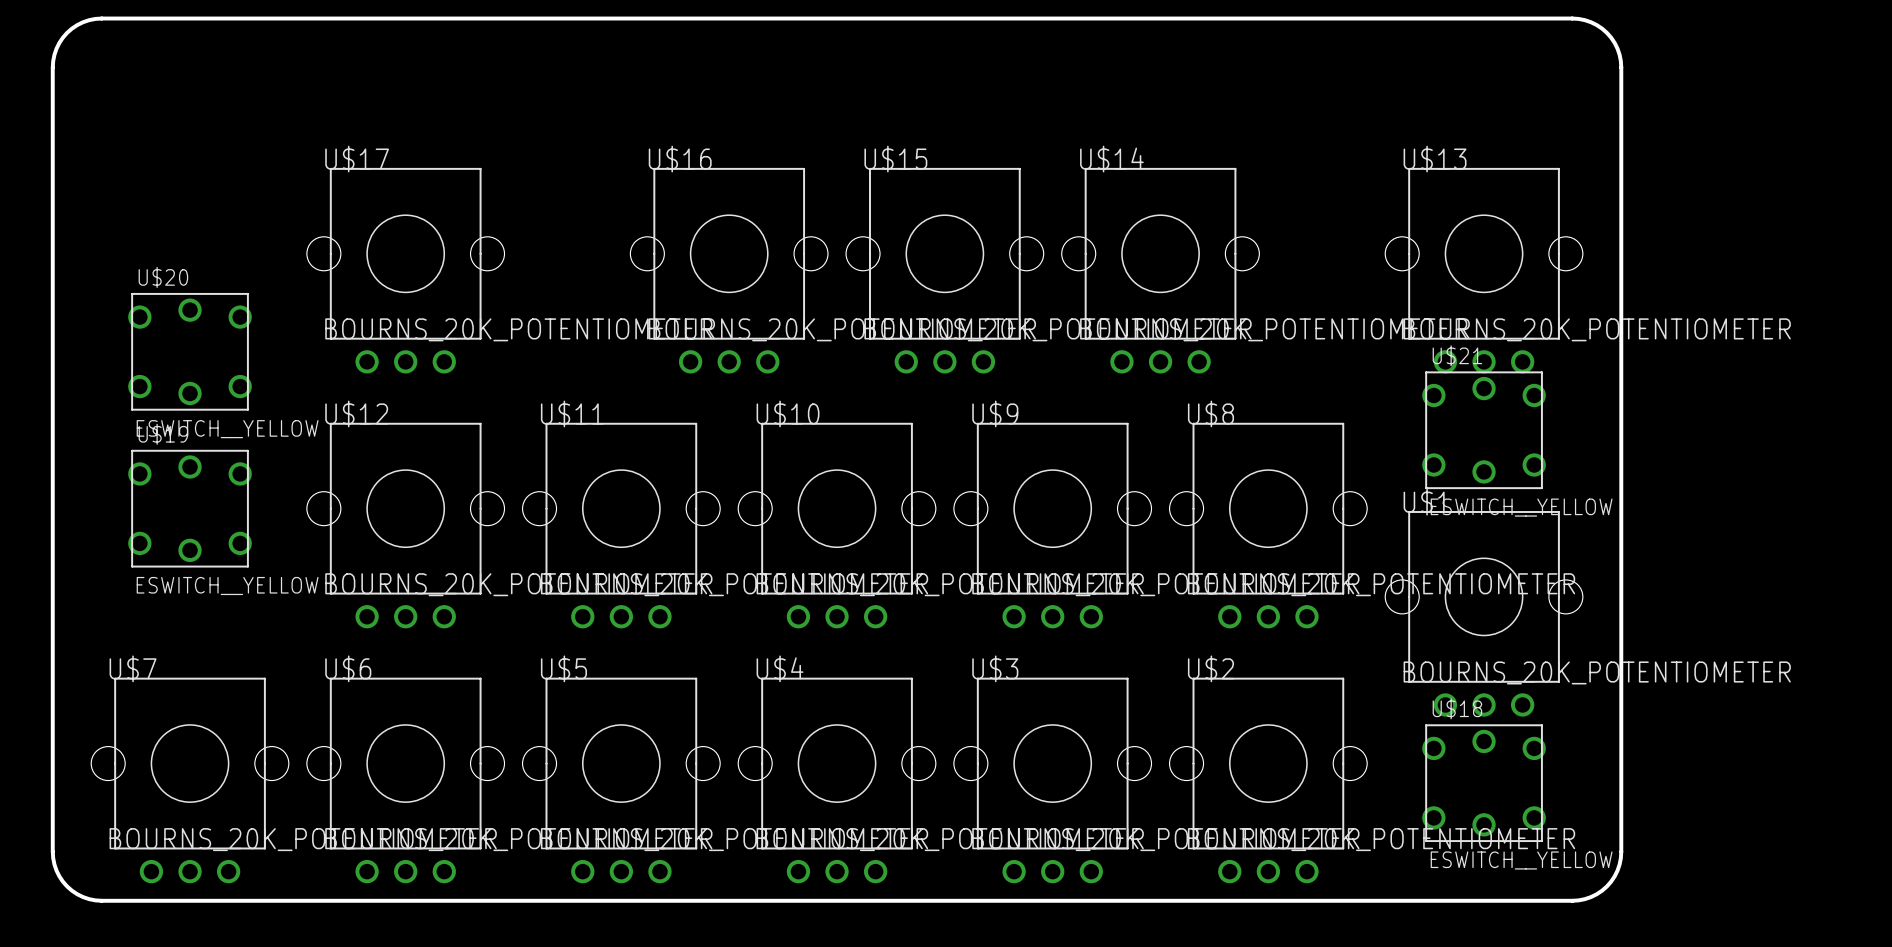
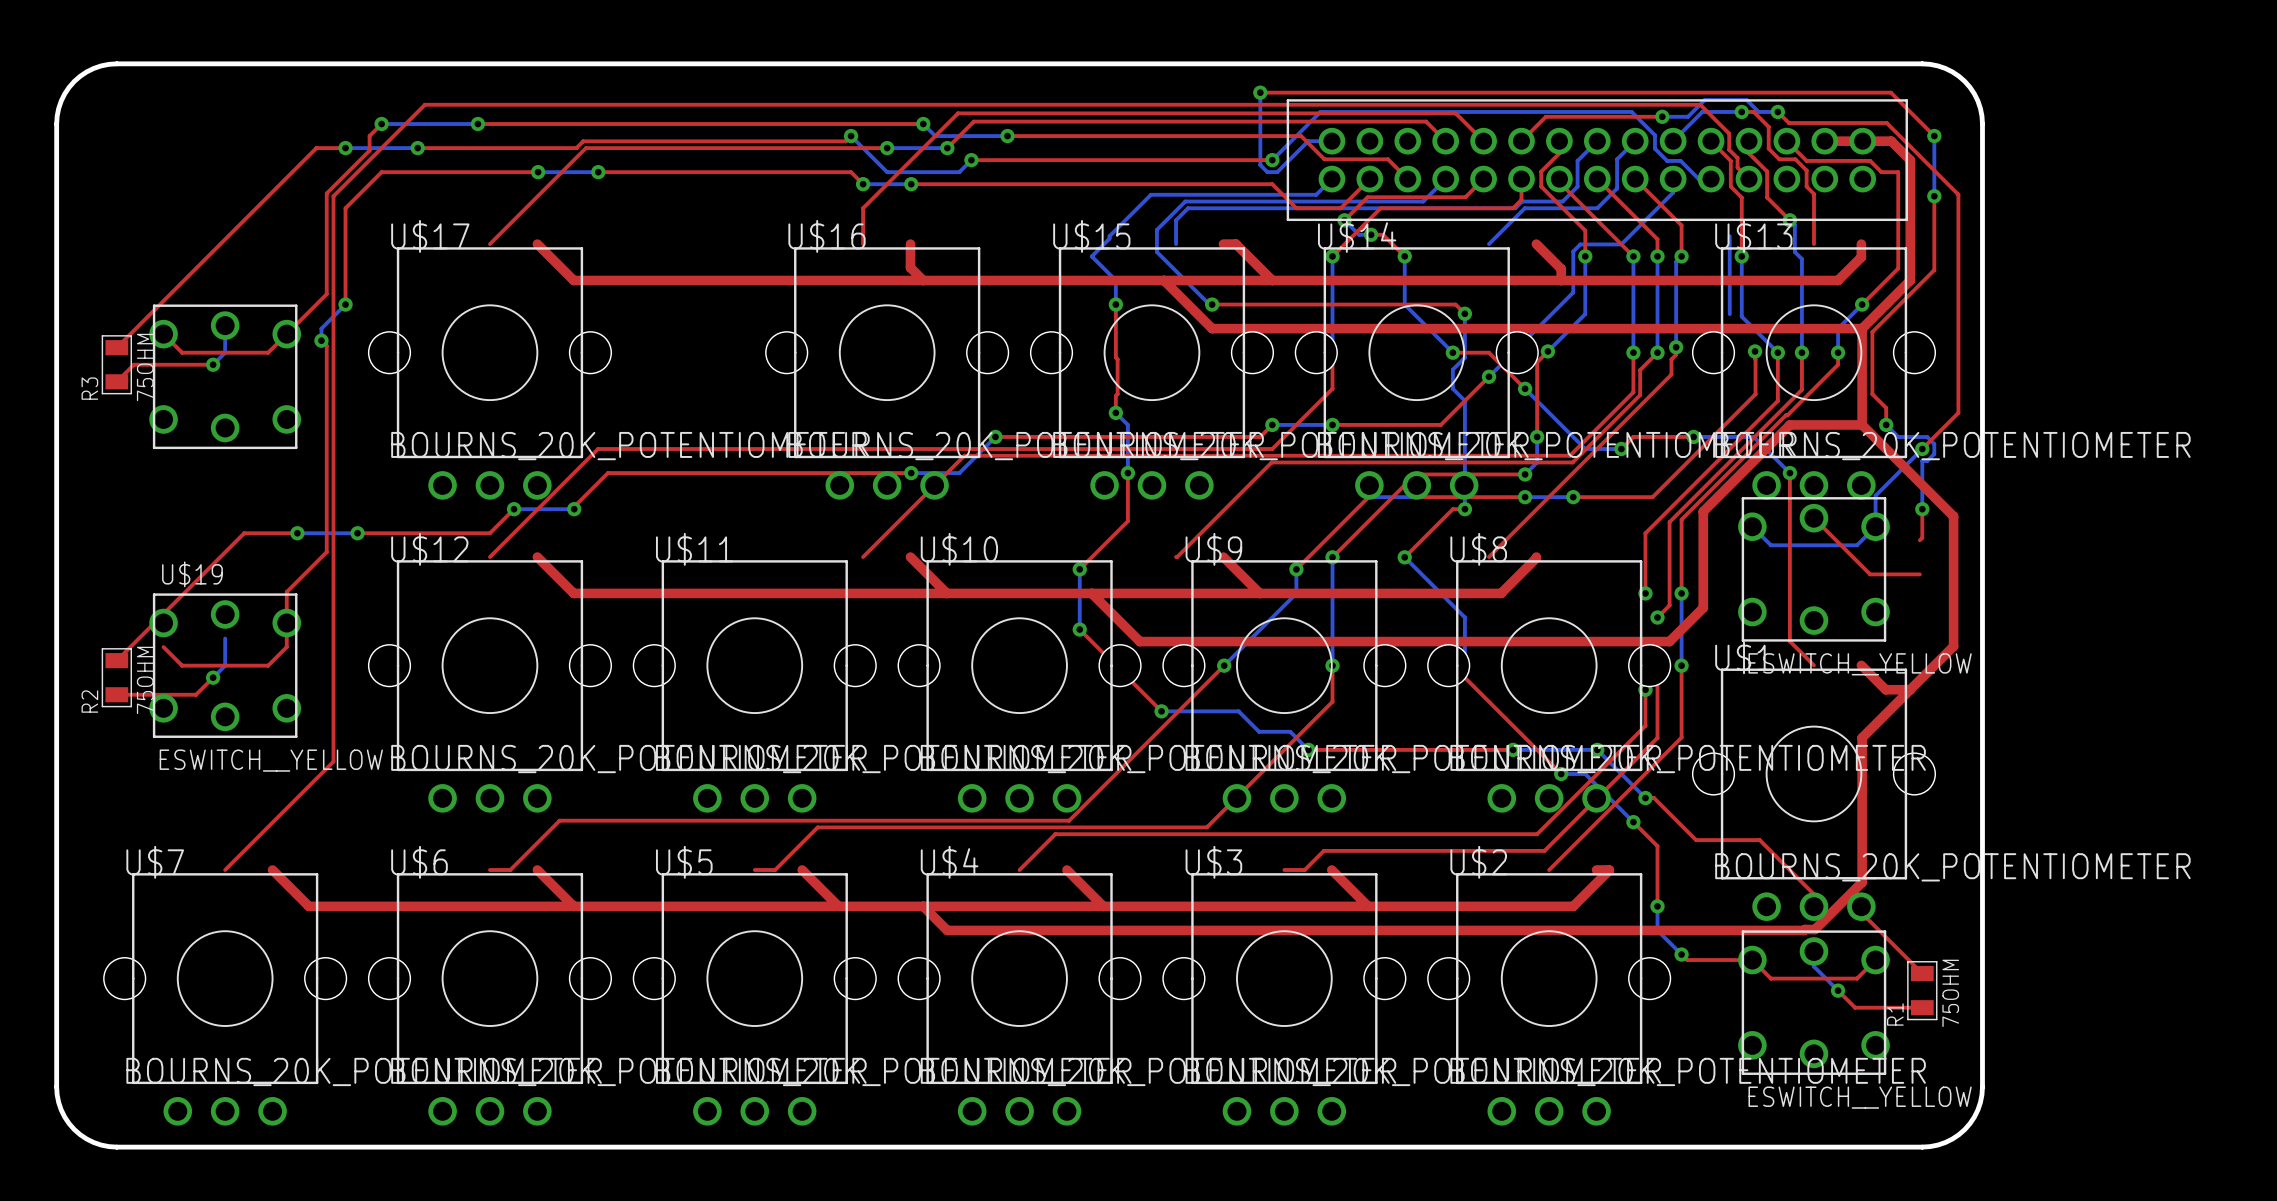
top track: none -> (1260, 92) (1890, 92) (1934, 136)
via: none -> (1260, 92)
bottom track: none -> (1260, 92) (1260, 165) (1267, 172) (1277, 172) (1308, 141) (1331, 141)
top track: none -> (1741, 111) (1753, 111) (1768, 126) (1768, 148) (1779, 159) (1795, 159) (1806, 170) (1806, 186) (1813, 193) (1813, 244)
bottom track: none -> (1741, 111) (1702, 111) (1673, 141)
via: none -> (1741, 111)
top track: none -> (1777, 111) (1788, 123) (1886, 123) (1958, 194) (1958, 412) (1922, 449)
bottom track: none -> (1777, 111) (1758, 111) (1746, 100) (1704, 100) (1687, 116) (1662, 116)
via: none -> (1777, 111)
top track: none -> (1662, 116) (1545, 116) (1521, 141)
via: none -> (1662, 116)
top track: none -> (381, 124) (369, 136) (369, 150) (326, 193) (326, 294) (268, 352) (182, 352) (163, 334)
bottom track: none -> (381, 124) (477, 124)
via: none -> (381, 124)
top track: none -> (477, 124) (923, 124)
via: none -> (477, 124)
bottom track: none -> (923, 124) (935, 136) (1007, 136)
via: none -> (923, 124)
top track: none -> (851, 136) (845, 141) (583, 141) (576, 148) (417, 148)
bottom track: none -> (851, 136) (887, 172) (959, 172) (971, 160)
via: none -> (851, 136)
top track: none -> (1007, 136) (1301, 136) (1324, 159) (1388, 159) (1407, 179)
via: none -> (1007, 136)
bottom track: none -> (1934, 136) (1934, 196)
via: none -> (1934, 136)
top track: none -> (1445, 141) (1426, 121) (973, 121) (947, 148)
top track: none -> (1483, 141) (1455, 113) (957, 113) (863, 208) (863, 244)
top track: none -> (1559, 141) (1559, 153) (1541, 171) (1541, 186) (1585, 230) (1585, 256)
bottom track: none -> (1597, 141) (1577, 160) (1577, 186) (1562, 201) (1522, 201) (1515, 208) (1188, 208) (1176, 220) (1176, 244)
bottom track: none -> (1635, 141) (1617, 159) (1617, 188) (1597, 208) (1524, 208) (1488, 244)
top track: none -> (1711, 141) (1730, 160) (1730, 186) (1741, 197) (1741, 256)
top track: none -> (1748, 141) (1748, 153) (1767, 171) (1767, 197) (1789, 220)
top track: none -> (1786, 141) (1806, 160) (1870, 160) (1881, 172) (1898, 172) (1898, 268) (1862, 304)
top track: none -> (1824, 141) (1891, 141) (1910, 160) (1910, 280) (1862, 328)
top track: none -> (345, 148) (316, 148) (116, 347)
bottom track: none -> (345, 148) (417, 148)
via: none -> (345, 148)
via: none -> (417, 148)
top track: none -> (887, 148) (585, 148) (489, 244)
bottom track: none -> (887, 148) (947, 148)
via: none -> (887, 148)
via: none -> (947, 148)
top track: none -> (971, 160) (1272, 160)
via: none -> (971, 160)
bottom track: none -> (1272, 160) (1320, 111) (1631, 111) (1654, 135) (1654, 148) (1667, 160) (1680, 160) (1698, 179) (1711, 179)
via: none -> (1272, 160)
part: none -> (1597, 160)
top track: none -> (538, 172) (381, 172) (345, 208) (345, 304)
bottom track: none -> (538, 172) (598, 172)
via: none -> (538, 172)
top track: none -> (598, 172) (851, 172) (863, 184)
via: none -> (598, 172)
bottom track: none -> (1331, 179) (1316, 194) (1150, 194) (1091, 256) (1115, 280) (1115, 304)
top track: none -> (1369, 179) (1340, 208) (1296, 208) (1272, 184) (911, 184)
bottom track: none -> (1445, 179) (1423, 201) (1185, 201) (1156, 229) (1156, 252) (1209, 304) (1212, 304)
top track: none -> (1483, 179) (1465, 197) (1367, 197) (1344, 220)
top track: none -> (1521, 179) (1521, 199) (1513, 208) (1380, 208) (1332, 256)
top track: none -> (1559, 179) (1559, 182) (1633, 256)
top track: none -> (1597, 179) (1657, 239) (1657, 256)
top track: none -> (1635, 179) (1681, 225) (1681, 256)
bottom track: none -> (1673, 179) (1673, 192) (1621, 244) (1580, 244) (1573, 251) (1573, 292) (1488, 376)
top track: none -> (1748, 179) (1737, 167) (1737, 158) (1729, 149) (1729, 133) (1700, 104) (424, 104) (333, 196) (333, 761) (225, 869)
bottom track: none -> (863, 184) (911, 184)
via: none -> (863, 184)
via: none -> (911, 184)
top track: none -> (1934, 196) (1934, 270) (1872, 331) (1872, 394) (1886, 407) (1886, 424)
via: none -> (1934, 196)
bottom track: none -> (1344, 220) (1359, 234) (1371, 234)
via: none -> (1344, 220)
bottom track: none -> (1789, 220) (1794, 225) (1794, 252) (1801, 259) (1801, 352)
via: none -> (1789, 220)
top track: none -> (1371, 234) (1383, 234) (1404, 256)
via: none -> (1371, 234)
bottom track: none -> (1729, 236) (1729, 314)
top track: none -> (537, 244) (573, 280) (1838, 280) (1861, 257) (1861, 244)
top track: none -> (910, 244) (910, 267) (923, 280)
top track: none -> (1223, 244) (1235, 244) (1272, 280)
top track: none -> (1536, 244) (1561, 268) (1561, 280)
bottom track: none -> (1332, 256) (1332, 364)
via: none -> (1332, 256)
bottom track: none -> (1404, 256) (1404, 304) (1452, 352)
via: none -> (1404, 256)
bottom track: none -> (1585, 256) (1585, 314) (1547, 351)
via: none -> (1585, 256)
bottom track: none -> (1633, 256) (1633, 352)
via: none -> (1633, 256)
bottom track: none -> (1657, 256) (1657, 352)
via: none -> (1657, 256)
bottom track: none -> (1681, 256) (1676, 261) (1676, 347)
via: none -> (1681, 256)
bottom track: none -> (1741, 256) (1741, 316) (1777, 352)
via: none -> (1741, 256)
top track: none -> (1164, 280) (1212, 328) (1862, 328)
bottom track: none -> (345, 304) (321, 328) (321, 340)
via: none -> (345, 304)
top track: none -> (1115, 304) (1115, 357) (1117, 359) (1115, 412)
via: none -> (1115, 304)
top track: none -> (1212, 304) (1455, 304) (1464, 313)
via: none -> (1212, 304)
bottom track: none -> (1862, 304) (1838, 328) (1838, 352)
via: none -> (1862, 304)
bottom track: none -> (1464, 313) (1464, 357) (1452, 369) (1452, 388) (1464, 400) (1464, 509)
via: none -> (1464, 313)
bottom track: none -> (225, 325) (225, 352) (213, 364)
top track: none -> (1862, 328) (1862, 424)
top track: none -> (321, 340) (326, 345) (326, 552) (286, 592) (286, 647) (268, 665) (182, 665) (163, 647)
via: none -> (321, 340)
top track: none -> (1676, 347) (1676, 354) (1671, 359) (1671, 374) (1488, 557)
via: none -> (1676, 347)
top track: none -> (1547, 351) (1537, 362) (1537, 436)
via: none -> (1547, 351)
top track: none -> (1755, 351) (1755, 394) (1652, 497) (1573, 497)
via: none -> (1755, 351)
top track: none -> (1452, 352) (1488, 352) (1525, 388)
via: none -> (1452, 352)
top track: none -> (1633, 352) (1633, 392) (1569, 455) (964, 455) (863, 557)
via: none -> (1633, 352)
top track: none -> (1657, 352) (1640, 370) (1640, 395) (1572, 462) (1271, 462) (1176, 557)
via: none -> (1657, 352)
top track: none -> (1777, 352) (1777, 400) (1645, 533) (1645, 593)
via: none -> (1777, 352)
top track: none -> (1801, 352) (1801, 389) (1669, 522) (1669, 605) (1657, 617)
via: none -> (1801, 352)
top track: none -> (1838, 352) (1838, 364) (1681, 519) (1681, 593)
via: none -> (1838, 352)
R3: none -> 75OHM (116, 364)
top track: none -> (213, 364) (133, 364) (116, 381)
via: none -> (213, 364)
top track: none -> (1332, 364) (1332, 388) (1272, 449) (598, 449) (489, 557)
part: none -> (225, 376)
top track: none -> (1488, 376) (1440, 424) (1332, 424)
via: none -> (1488, 376)
bottom track: none -> (1525, 388) (1585, 449) (1621, 449)
via: none -> (1525, 388)
bottom track: none -> (1115, 412) (1127, 424) (1127, 473)
via: none -> (1115, 412)
top track: none -> (1272, 424) (1260, 436) (995, 436)
bottom track: none -> (1272, 424) (1332, 424)
via: none -> (1272, 424)
via: none -> (1332, 424)
top track: none -> (1862, 424) (1953, 516) (1953, 646) (1862, 737) (1862, 882) (1814, 929) (947, 930) (923, 906)
top track: none -> (1862, 424) (1789, 424) (1703, 511) (1703, 607) (1669, 641) (1139, 641) (1091, 593)
bottom track: none -> (1886, 424) (1898, 437) (1927, 437) (1934, 444) (1934, 453) (1927, 460) (1922, 460)
via: none -> (1886, 424)
bottom track: none -> (995, 436) (959, 473) (911, 473)
via: none -> (995, 436)
bottom track: none -> (1537, 436) (1537, 462) (1525, 474)
via: none -> (1537, 436)
top track: none -> (1693, 436) (1633, 436) (1621, 449)
bottom track: none -> (1693, 436) (1753, 436) (1789, 473)
via: none -> (1693, 436)
via: none -> (1621, 449)
bottom track: none -> (1922, 449) (1875, 495) (1875, 526) (1857, 545) (1770, 545) (1752, 526)
via: none -> (1922, 449)
bottom track: none -> (1922, 461) (1922, 509)
U$20: ESWITCH__YELLOW (190, 351) -> none
top track: none -> (911, 473) (607, 473) (574, 506) (574, 509)
via: none -> (911, 473)
top track: none -> (1127, 473) (1127, 521) (1079, 569)
via: none -> (1127, 473)
top track: none -> (1789, 473) (1789, 641) (1813, 665)
via: none -> (1789, 473)
top track: none -> (1525, 474) (1415, 474) (1332, 557)
via: none -> (1525, 474)
U$21 name: U$21 (1457, 355) -> none
top track: none -> (1368, 497) (1296, 569)
bottom track: none -> (1368, 497) (1416, 497)
top track: none -> (1416, 497) (1525, 497)
bottom track: none -> (1525, 497) (1573, 497)
via: none -> (1525, 497)
via: none -> (1573, 497)
top track: none -> (514, 509) (489, 533) (357, 533)
bottom track: none -> (514, 509) (574, 509)
via: none -> (514, 509)
via: none -> (574, 509)
top track: none -> (1464, 509) (1452, 509) (1404, 557)
via: none -> (1464, 509)
top track: none -> (1922, 509) (1922, 537) (1919, 540)
via: none -> (1922, 509)
top track: none -> (1813, 518) (1870, 574) (1919, 574)
top track: none -> (297, 533) (244, 533) (116, 660)
bottom track: none -> (297, 533) (357, 533)
via: none -> (297, 533)
via: none -> (357, 533)
top track: none -> (537, 557) (573, 593) (1501, 593) (1536, 557)
top track: none -> (910, 557) (946, 593)
top track: none -> (1223, 557) (1259, 593)
bottom track: none -> (1332, 557) (1332, 665)
via: none -> (1332, 557)
bottom track: none -> (1404, 557) (1464, 617) (1464, 677)
via: none -> (1404, 557)
bottom track: none -> (1079, 569) (1079, 629)
via: none -> (1079, 569)
bottom track: none -> (1296, 569) (1296, 593) (1224, 665)
via: none -> (1296, 569)
via: none -> (1645, 593)
bottom track: none -> (1681, 593) (1681, 665)
via: none -> (1681, 593)
via: none -> (1657, 617)
top track: none -> (1079, 629) (1161, 711)
via: none -> (1079, 629)
bottom track: none -> (225, 638) (225, 665) (213, 677)
top track: none -> (1224, 665) (1069, 820) (559, 820) (510, 869) (489, 869)
via: none -> (1224, 665)
top track: none -> (1332, 665) (1332, 701) (1206, 827) (817, 827) (775, 869) (754, 869)
via: none -> (1332, 665)
top track: none -> (1657, 665) (1657, 737) (1544, 850) (1323, 850) (1304, 869) (1284, 869)
top track: none -> (1681, 665) (1681, 737) (1549, 869)
via: none -> (1681, 665)
top track: none -> (1861, 665) (1885, 689) (1910, 689)
R2: none -> 75OHM (116, 677)
top track: none -> (213, 677) (196, 694) (116, 694)
via: none -> (213, 677)
top track: none -> (1464, 677) (1561, 773)
top track: none -> (1645, 689) (1645, 725) (1537, 834) (1055, 834) (1019, 869)
via: none -> (1645, 689)
bottom track: none -> (1161, 711) (1238, 711) (1259, 731) (1290, 731) (1308, 749)
via: none -> (1161, 711)
top track: none -> (1308, 749) (1513, 749)
via: none -> (1308, 749)
bottom track: none -> (1513, 749) (1597, 749) (1645, 798)
via: none -> (1513, 749)
via: none -> (1597, 749)
bottom track: none -> (1561, 773) (1585, 773) (1633, 822)
via: none -> (1561, 773)
top track: none -> (1645, 798) (1654, 798) (1696, 840) (1759, 840) (1813, 894)
via: none -> (1645, 798)
top track: none -> (1633, 822) (1657, 846) (1657, 906)
via: none -> (1633, 822)
top track: none -> (272, 869) (308, 906) (1573, 906) (1609, 870) (1596, 869)
top track: none -> (537, 869) (573, 906)
top track: none -> (802, 869) (838, 906)
top track: none -> (1066, 869) (1103, 906)
top track: none -> (1331, 869) (1368, 906)
bottom track: none -> (1657, 906) (1657, 930) (1681, 954)
via: none -> (1657, 906)
U$18 name: U$18 (1457, 708) -> none
top track: none -> (1862, 918) (1867, 918) (1922, 973)
bottom track: none -> (1813, 951) (1813, 966) (1838, 990)
top track: none -> (1681, 954) (1687, 960) (1752, 960) (1770, 978) (1857, 978) (1875, 960)
via: none -> (1681, 954)
top track: none -> (1838, 990) (1855, 1007) (1922, 1007)
via: none -> (1838, 990)
R1: none -> 75OHM (1922, 990)

